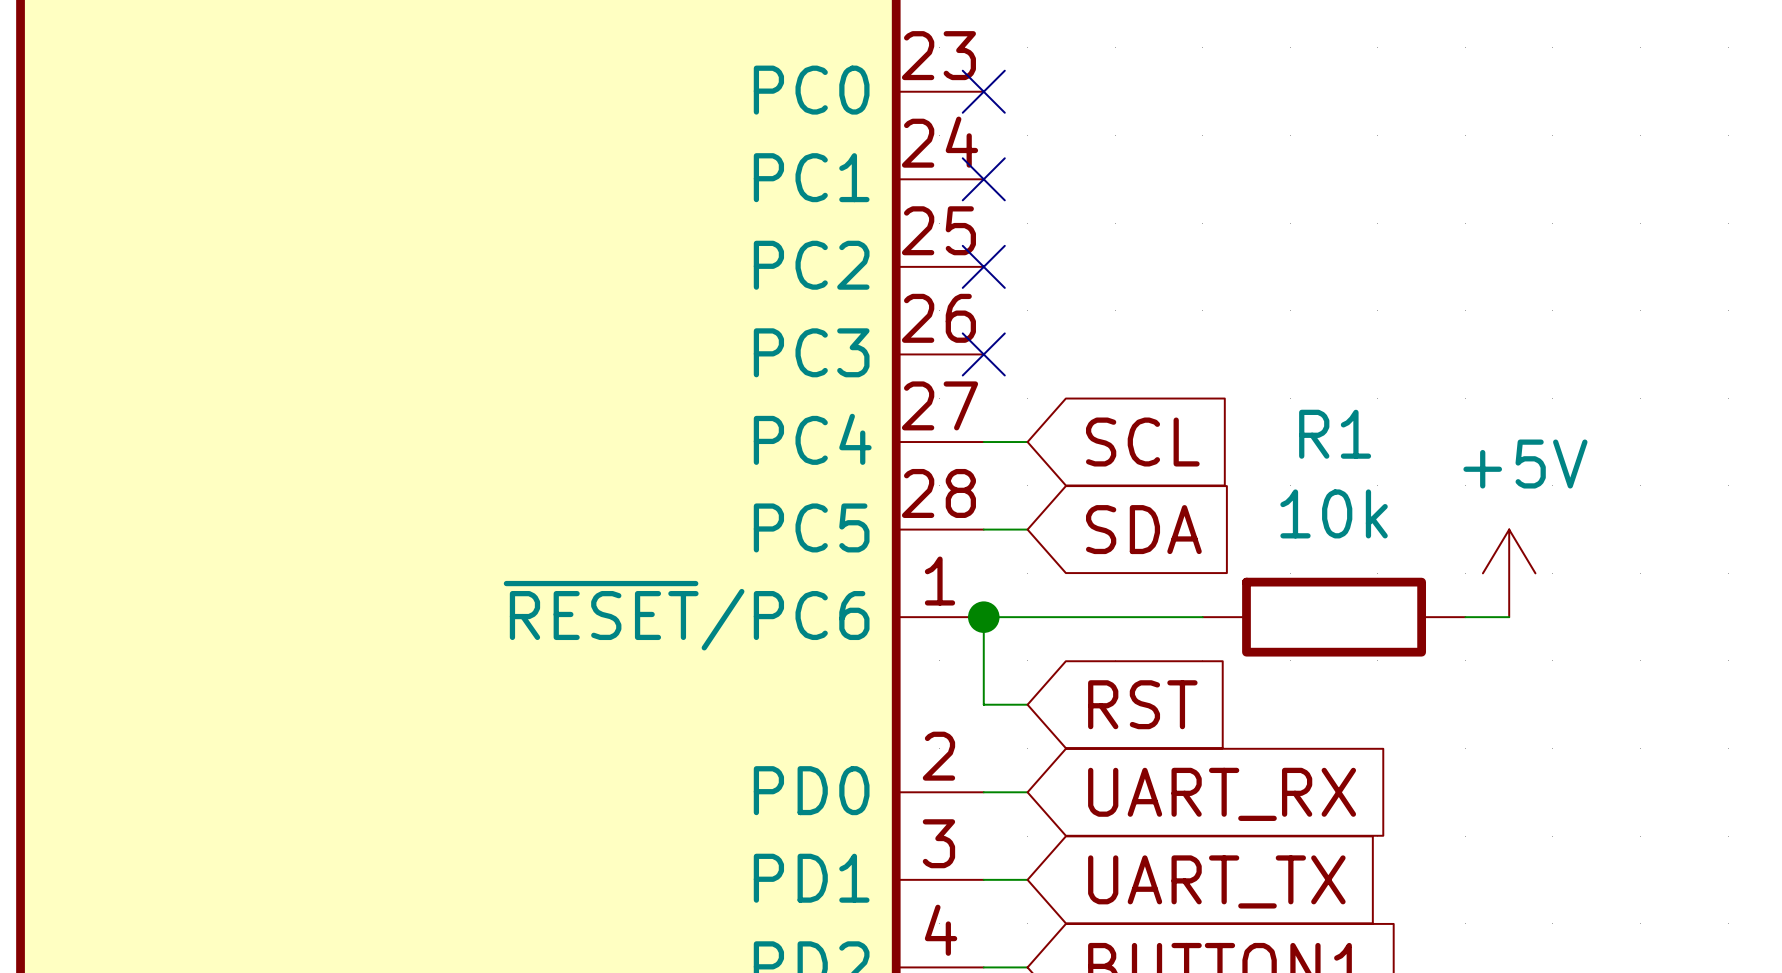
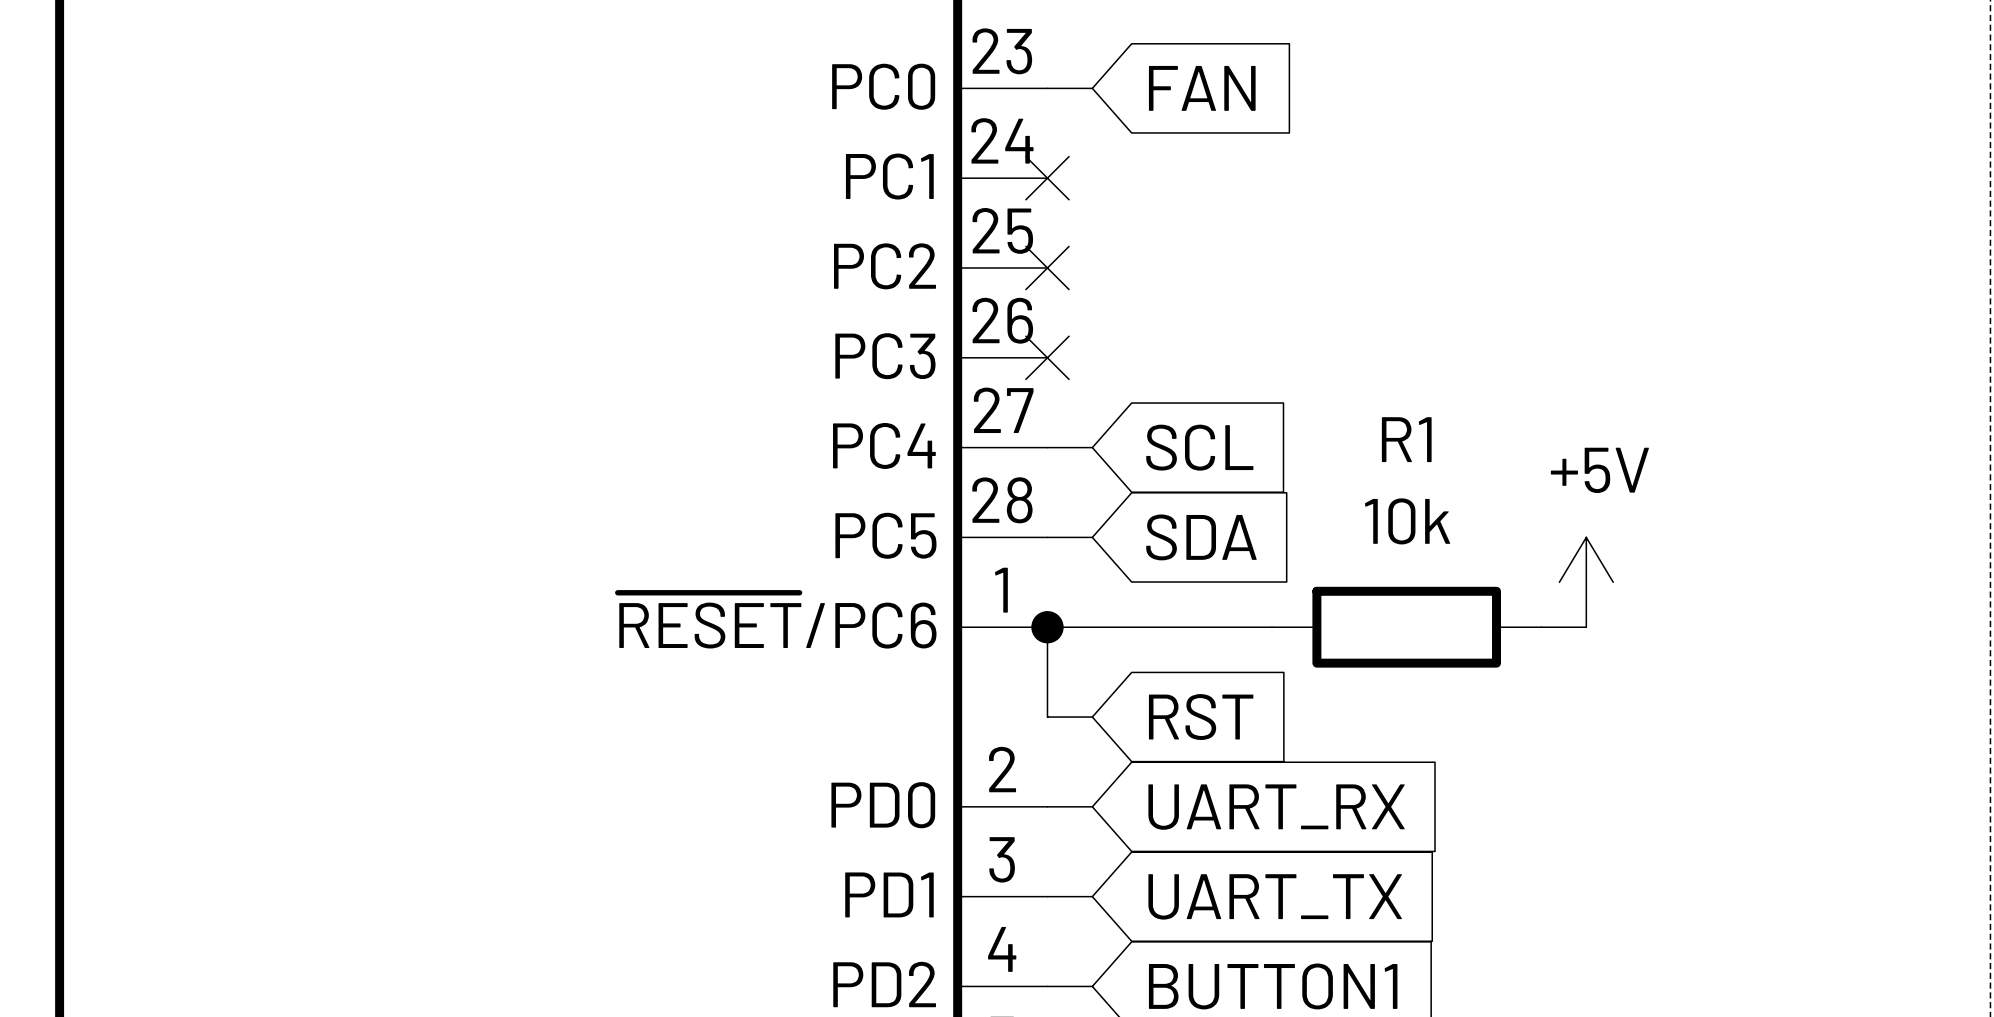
wire: none -> (1047, 88) (1092, 88)
no-connect mark: (983, 91) -> none
global label: none -> FAN (1202, 88)

